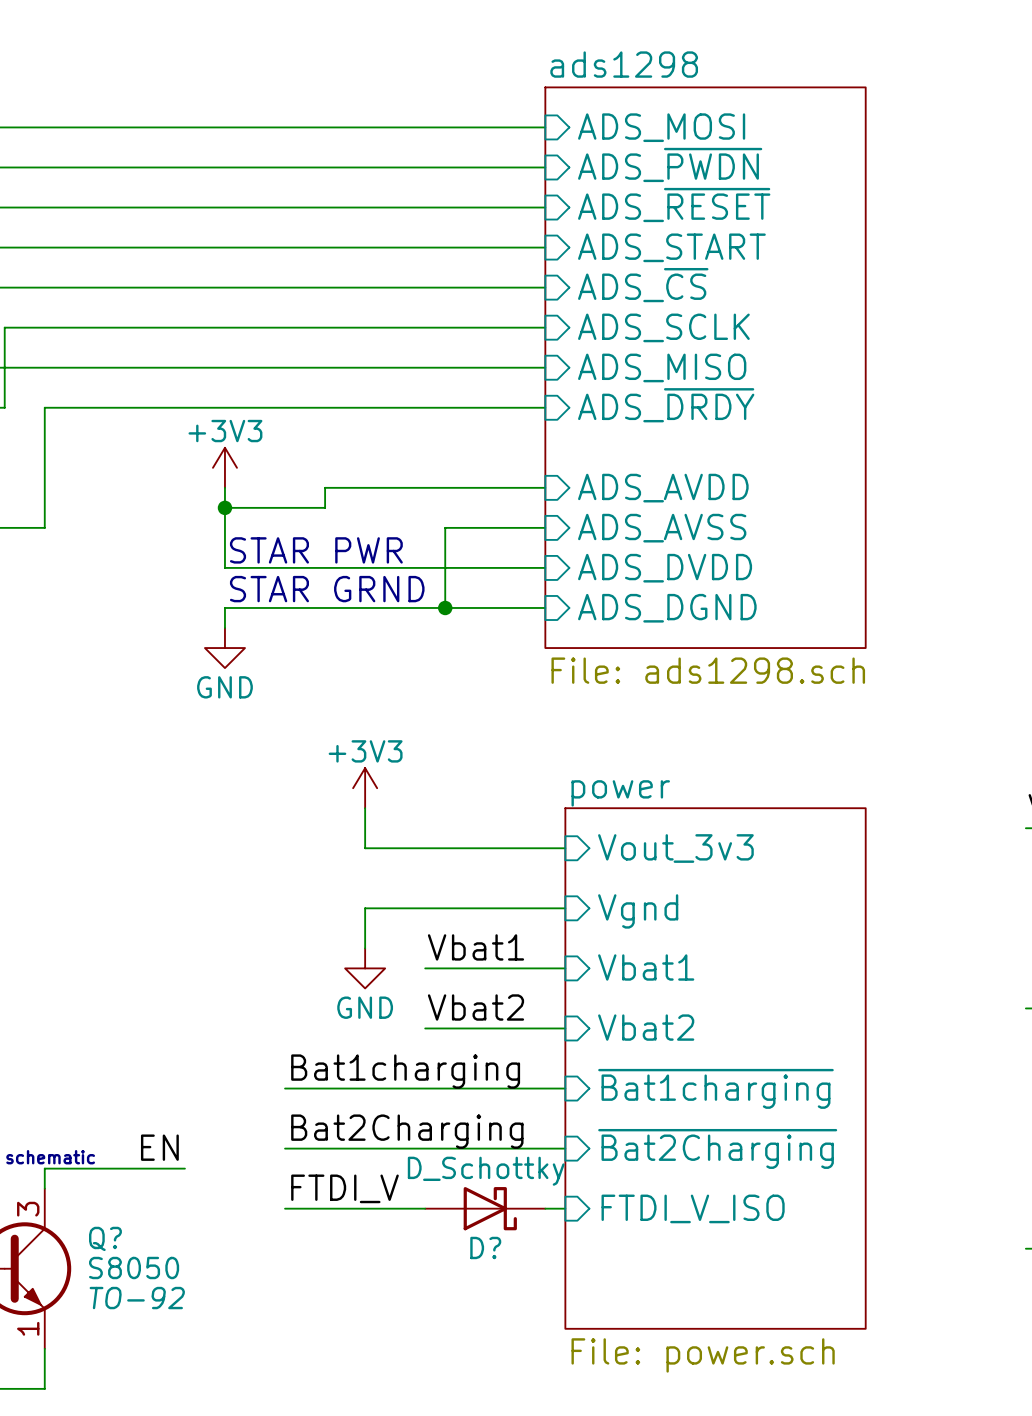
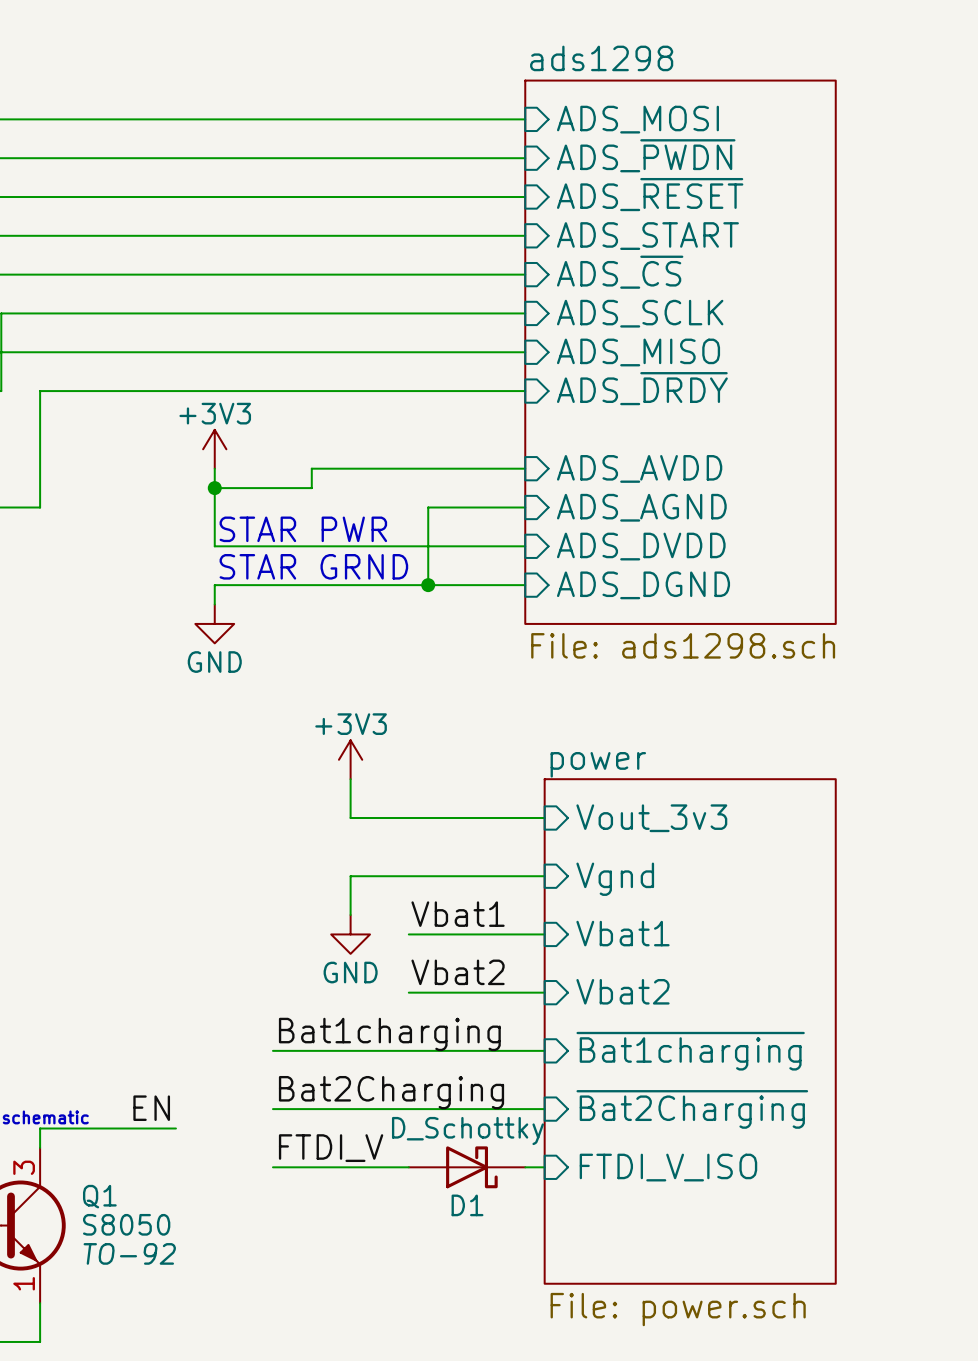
sheet pin: ADS_AVSS (662, 528) -> ADS_AGND (641, 507)
Q? name: Q? (105, 1238) -> Q1 (99, 1196)
D? name: D? (485, 1247) -> D1 (467, 1205)

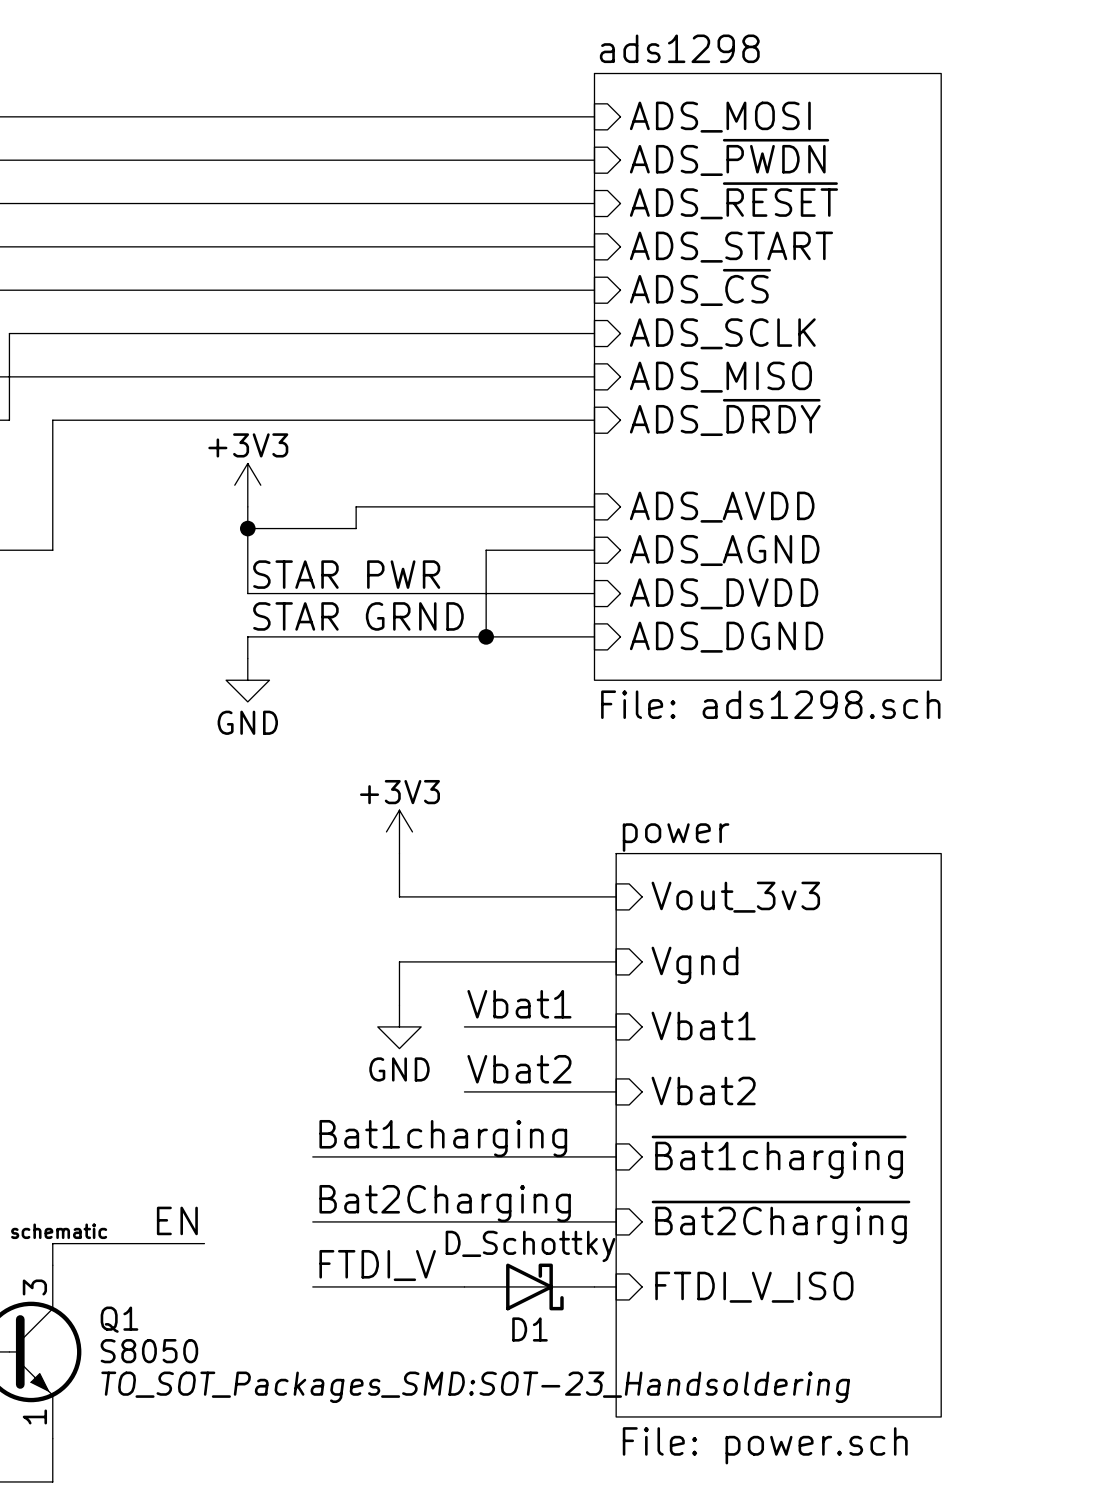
Q1 text: TO-92 (129, 1253) -> TO_SOT_Packages_SMD:SOT-23_Handsoldering (475, 1387)

